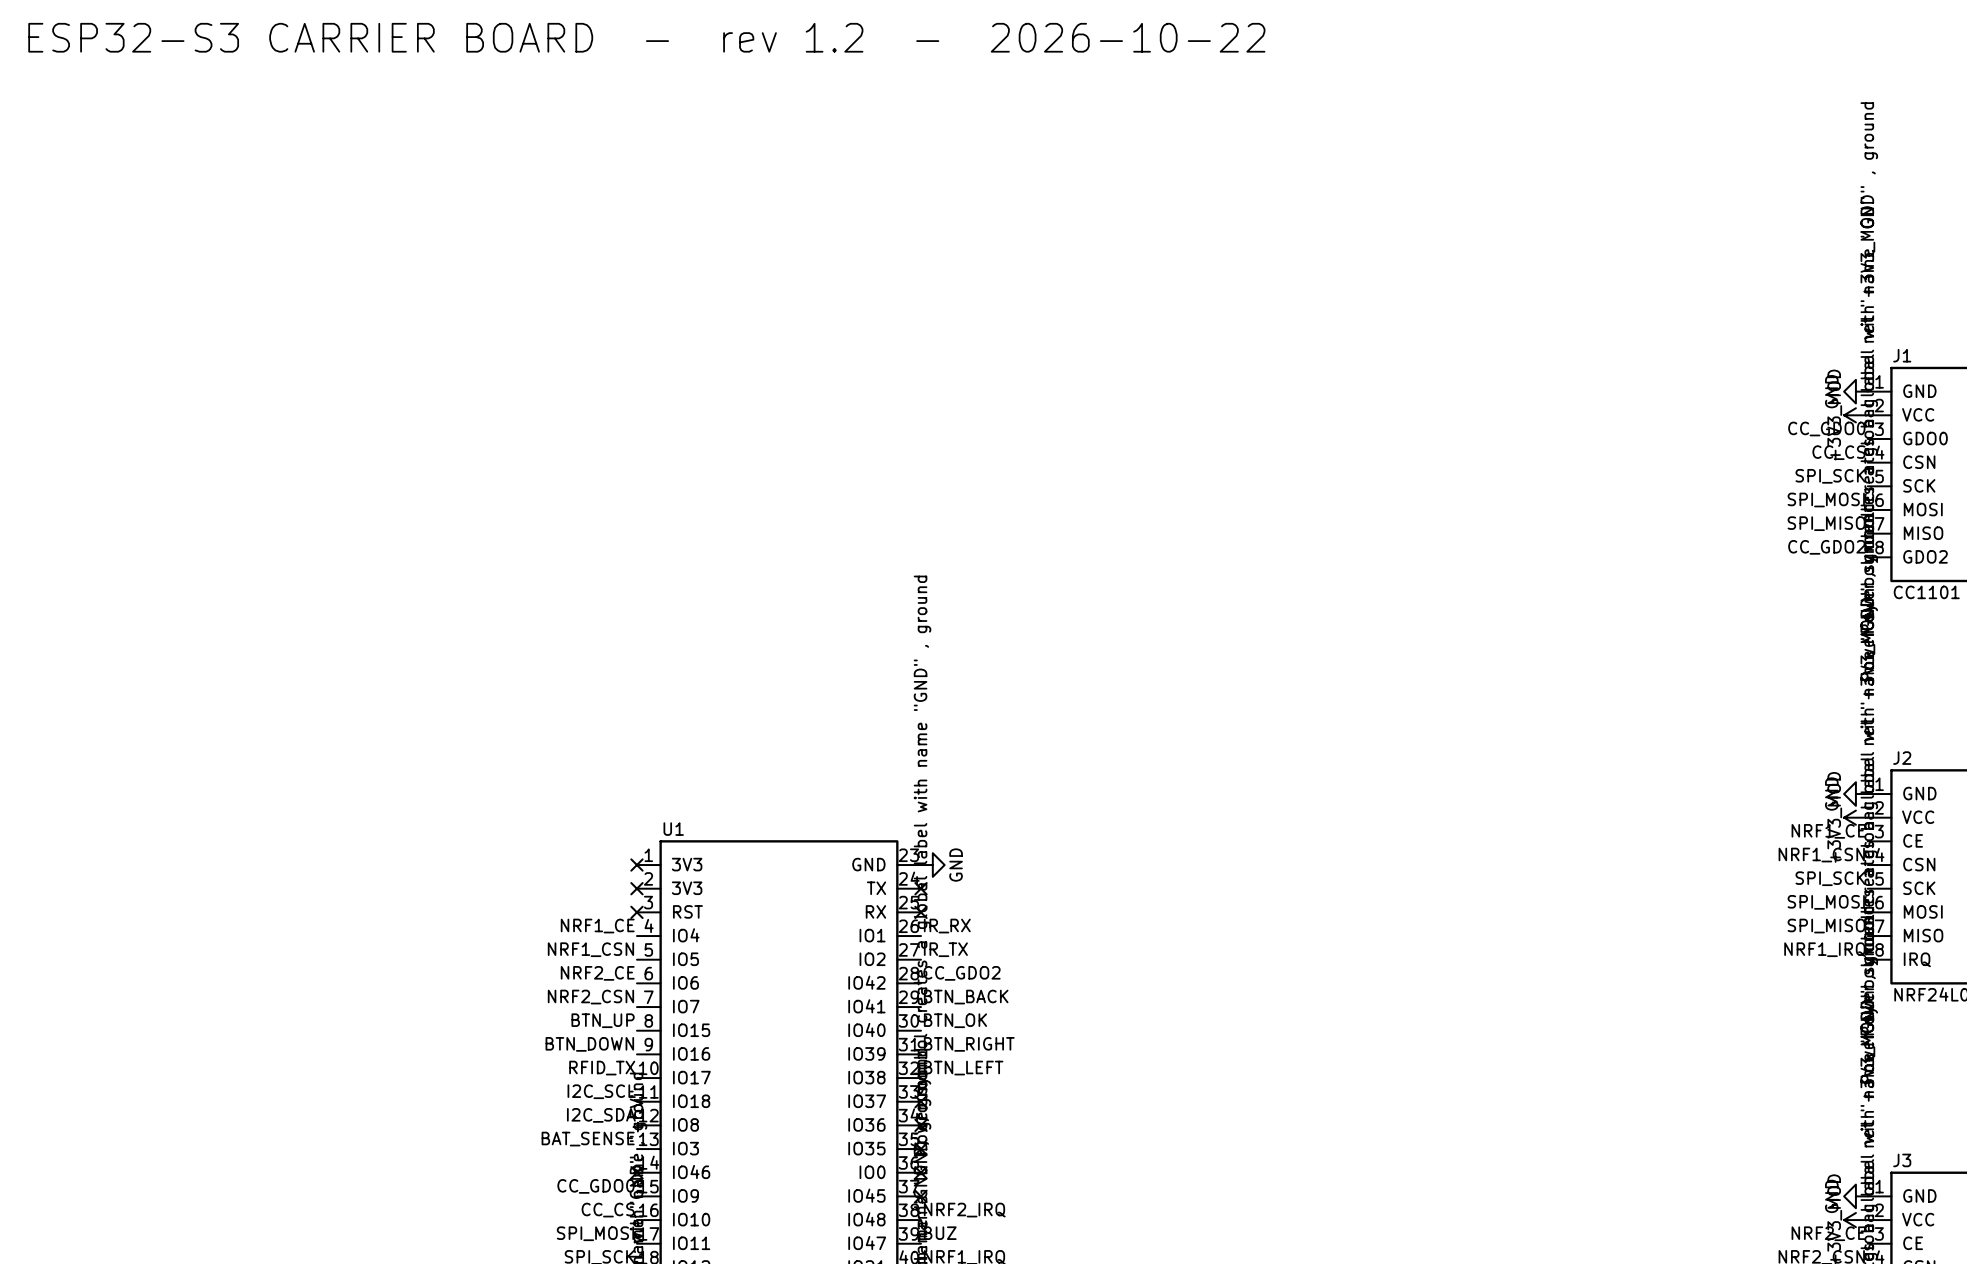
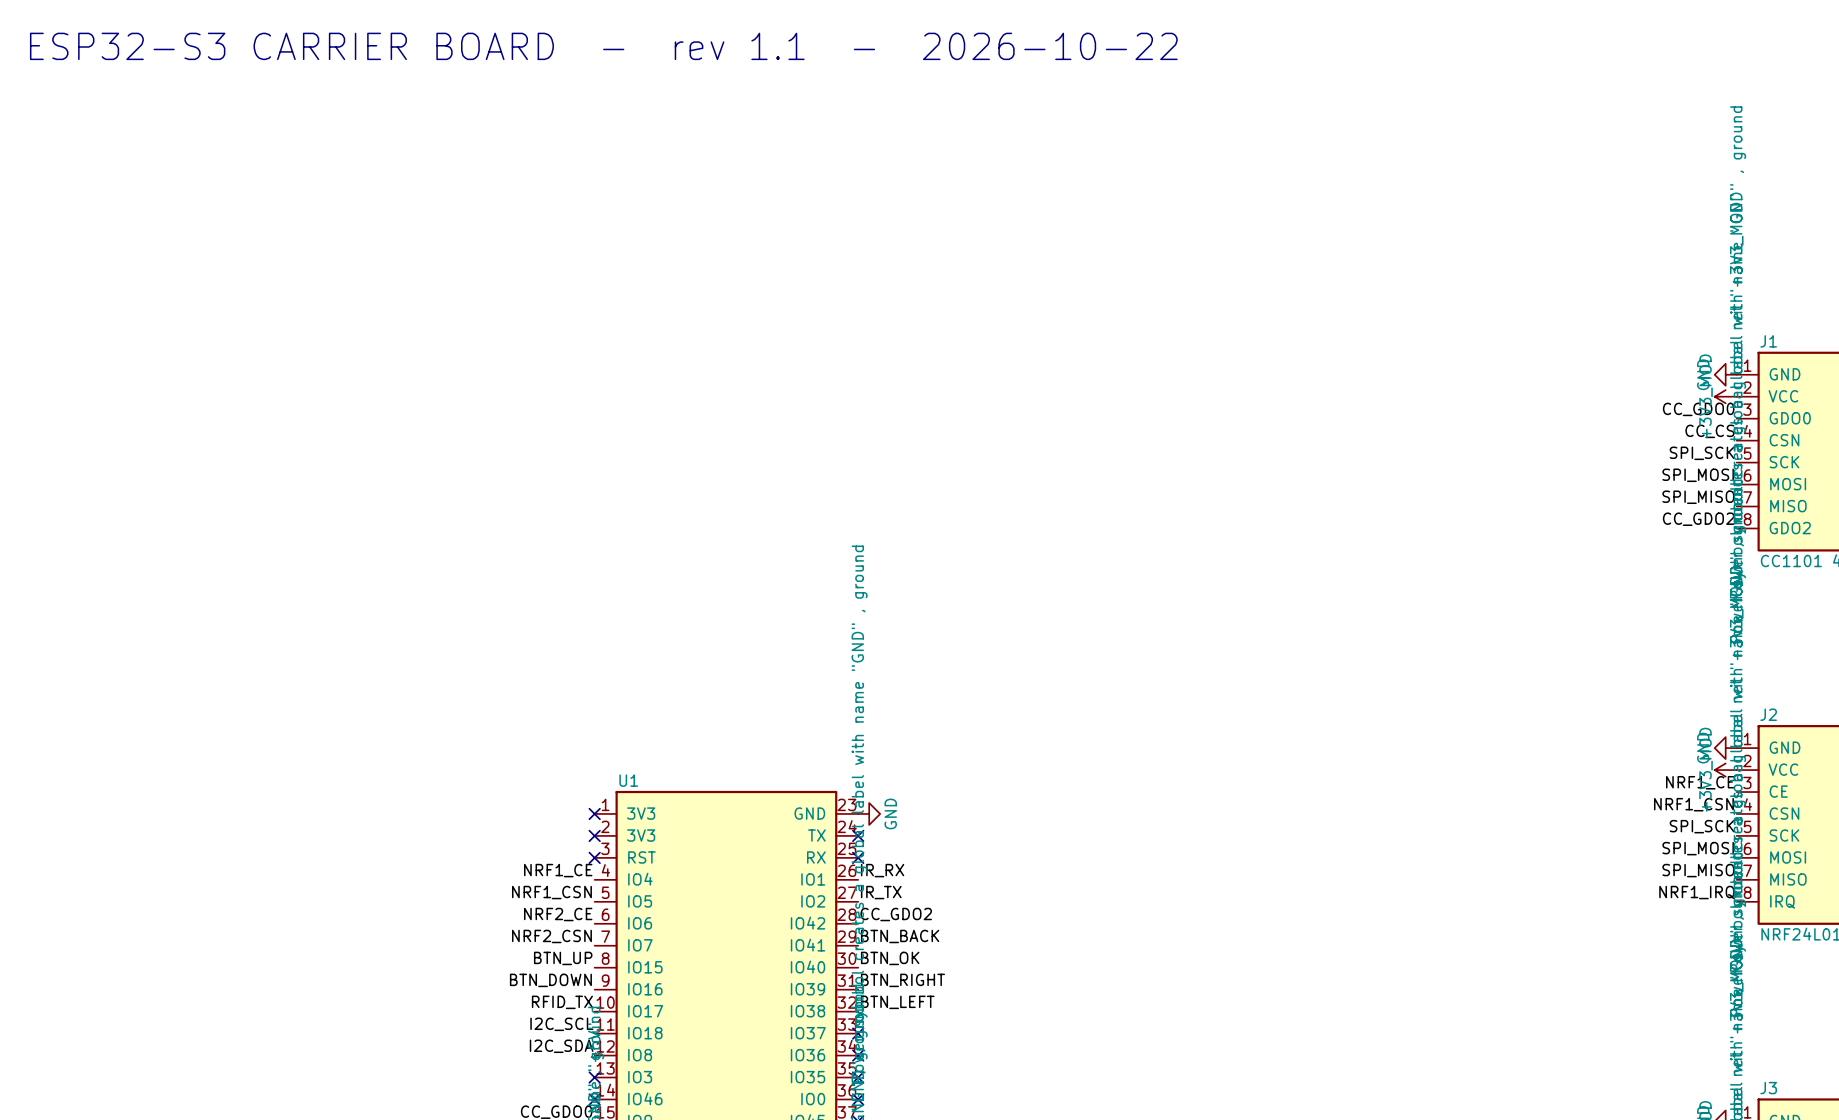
text: ESP32-S3 CARRIER BOARD - rev 1.2 - 2026-10-22 (646, 37) -> ESP32-S3 CARRIER BOARD - rev 1.1 - 2026-10-22 (603, 46)
label: BAT_SENSE (588, 1139) -> none
no-connect mark: none -> (594, 1077)

